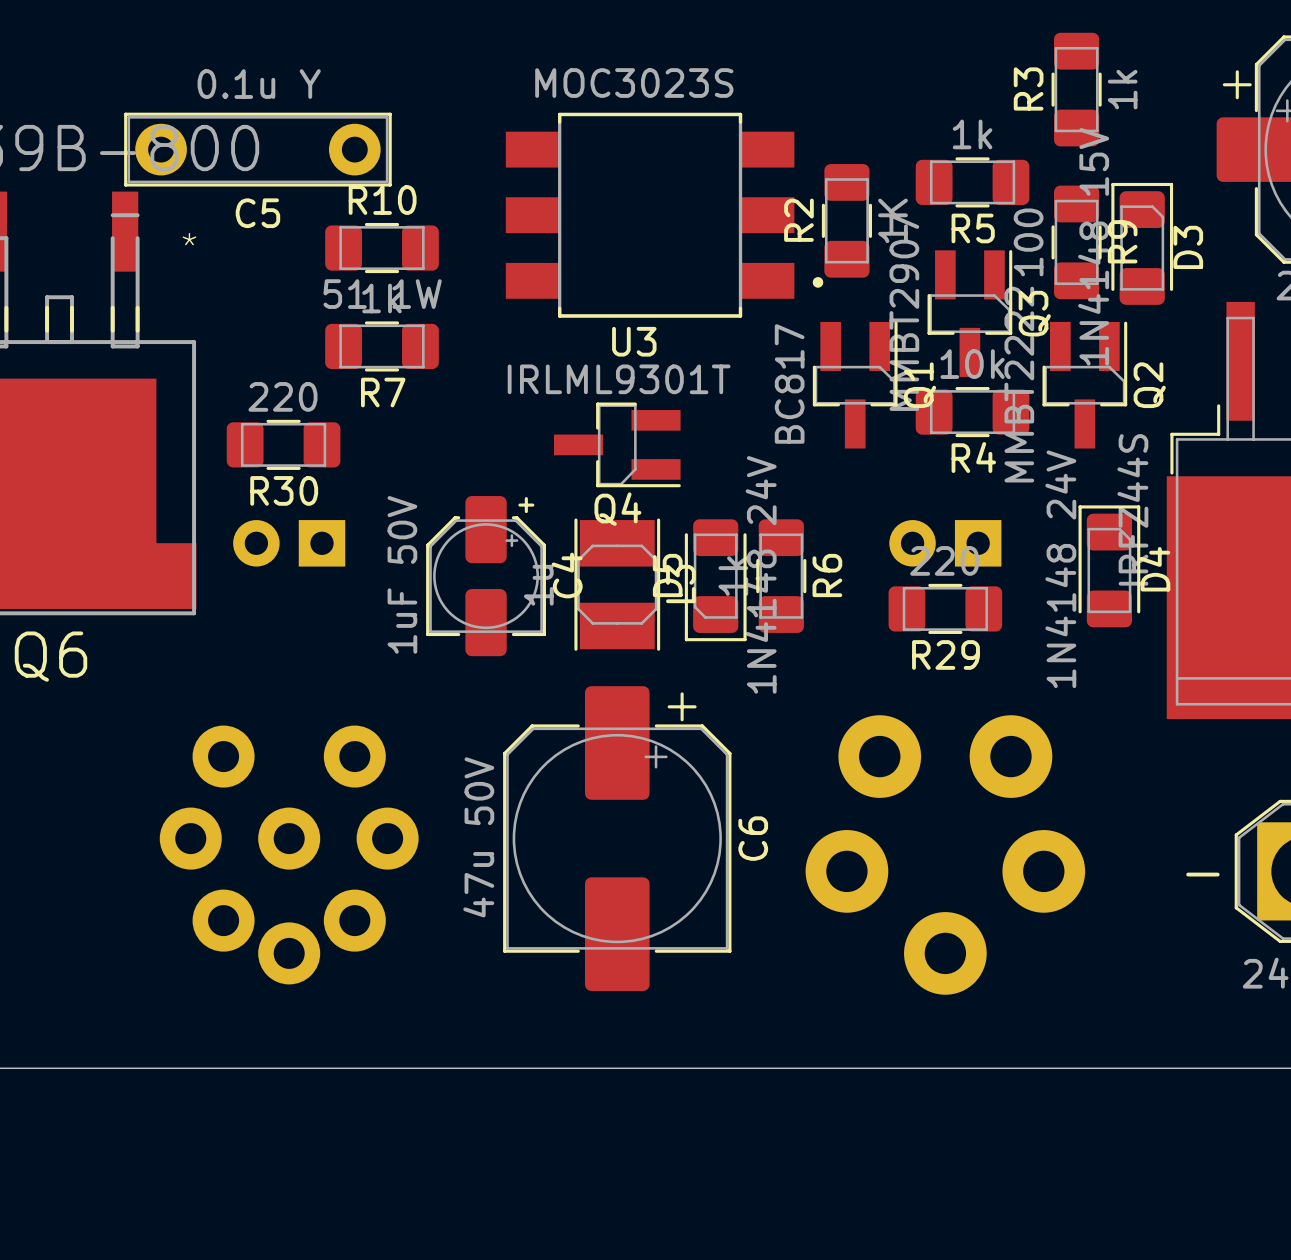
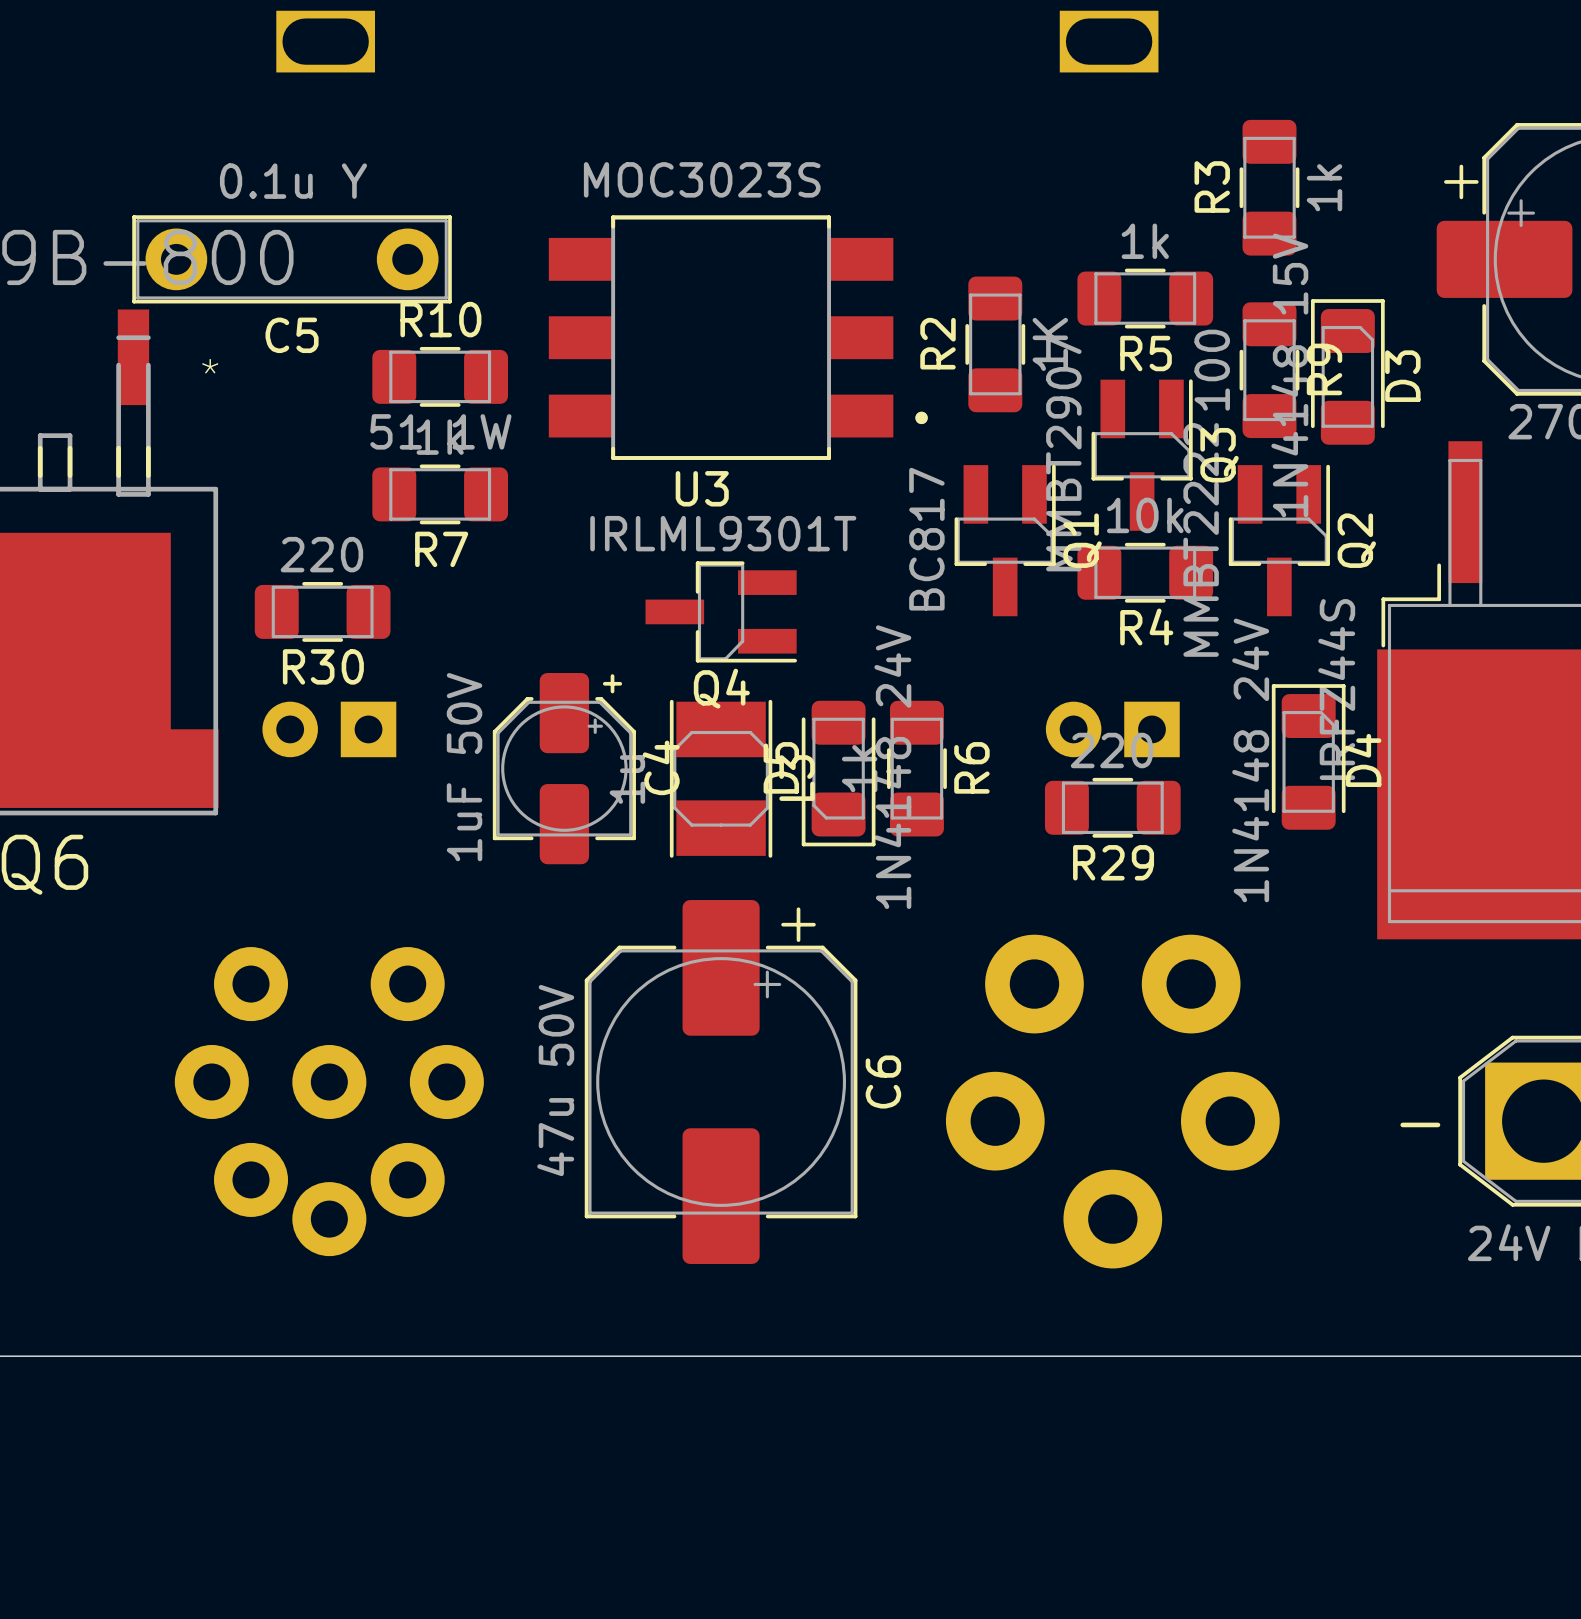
U3 position: (664, 215) -> (738, 337)

